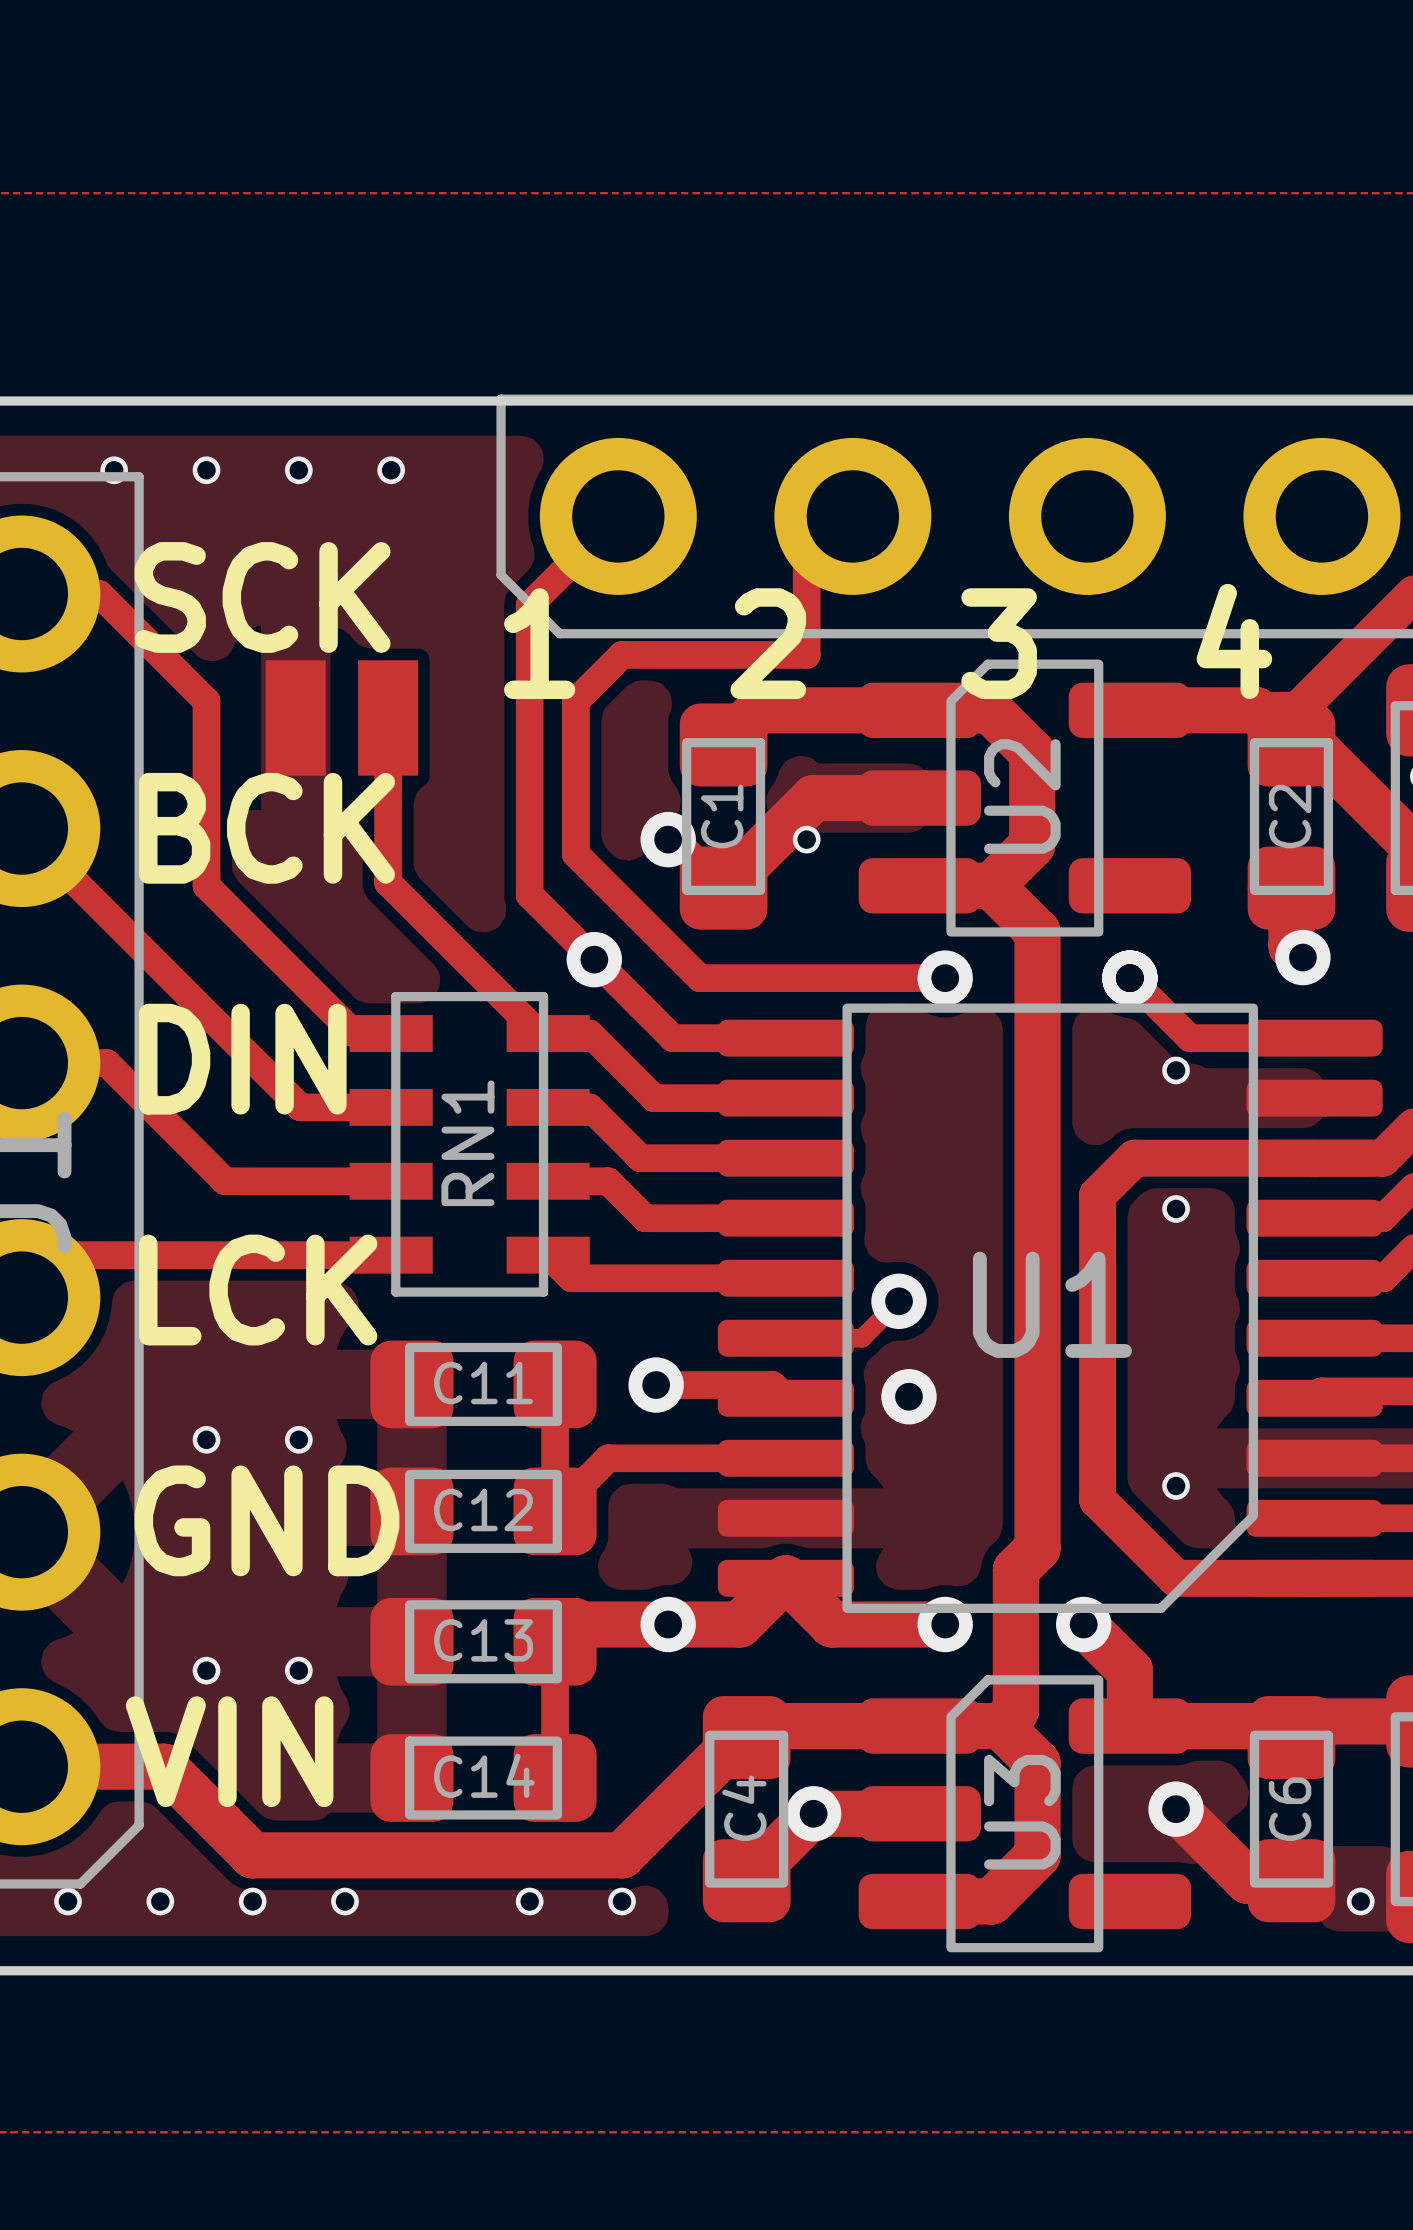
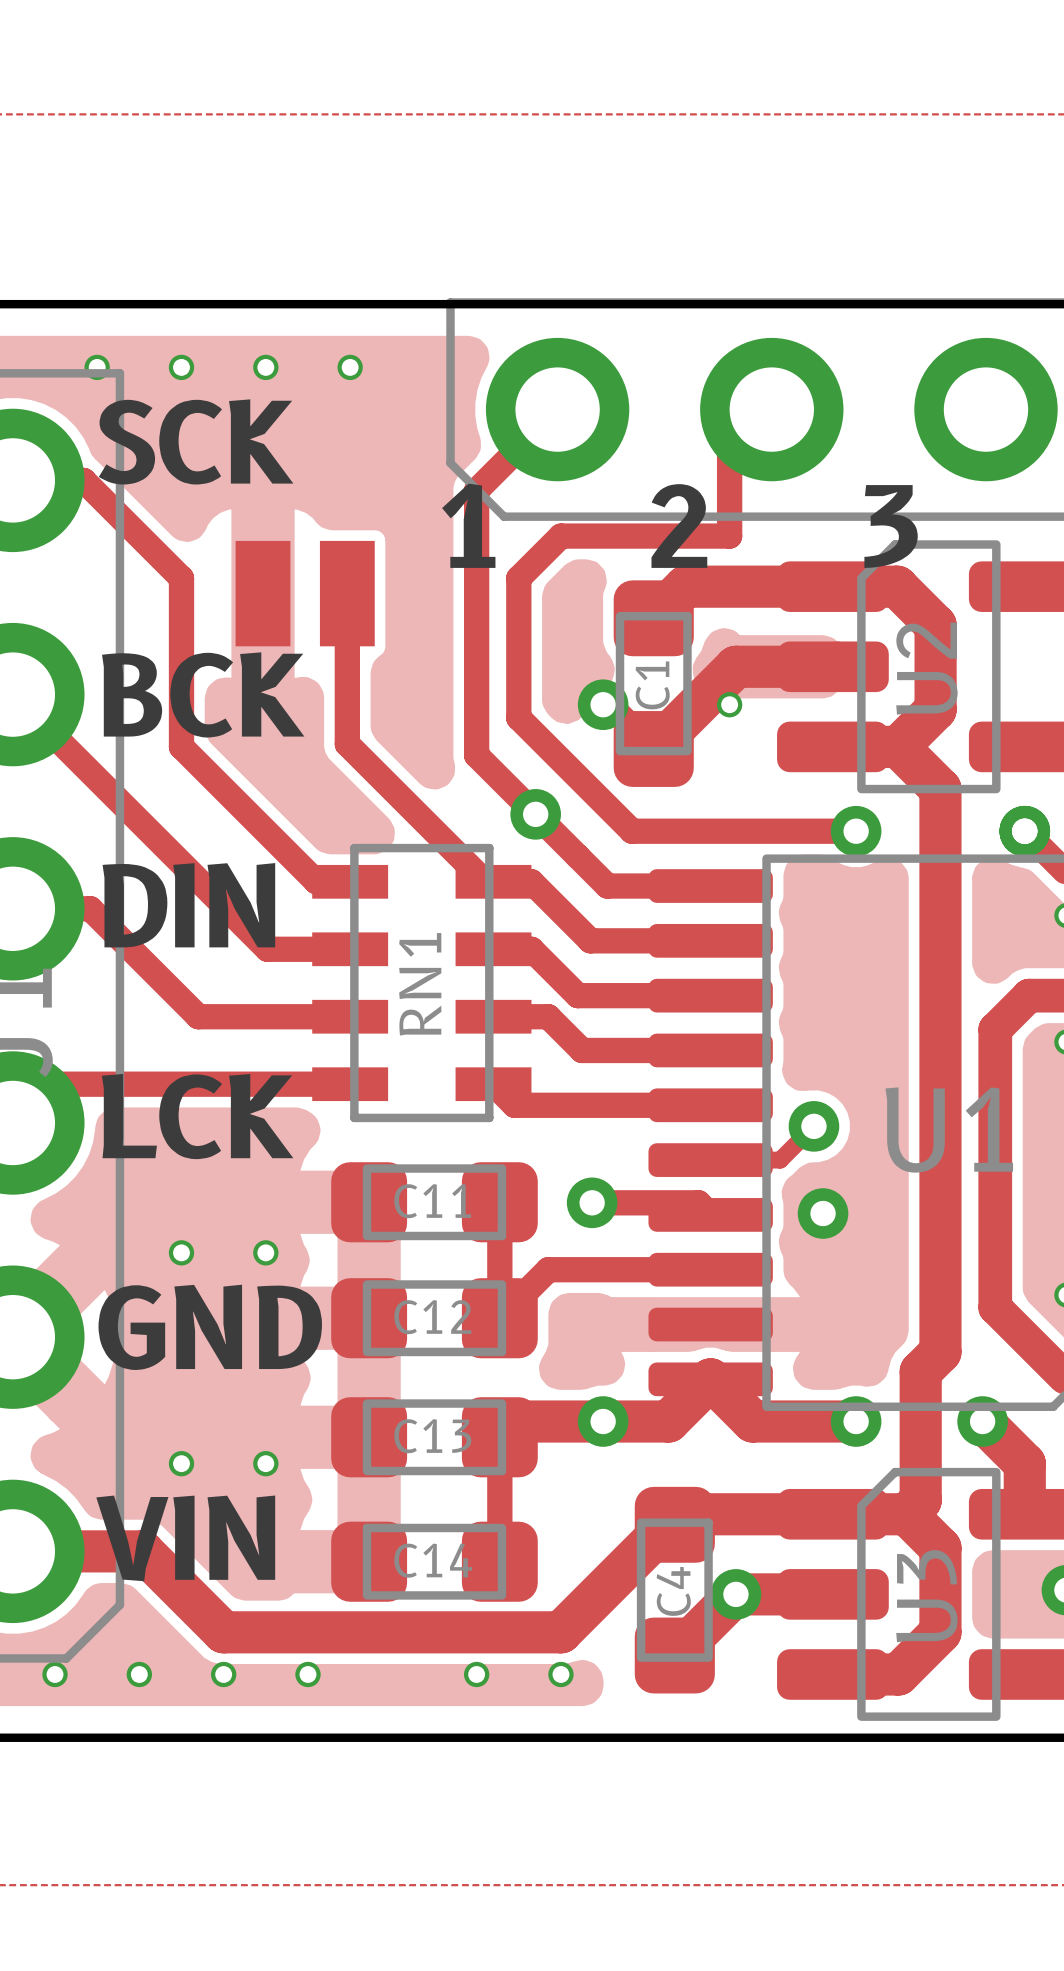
text position: SCK (262, 597) -> SCK (196, 441)

